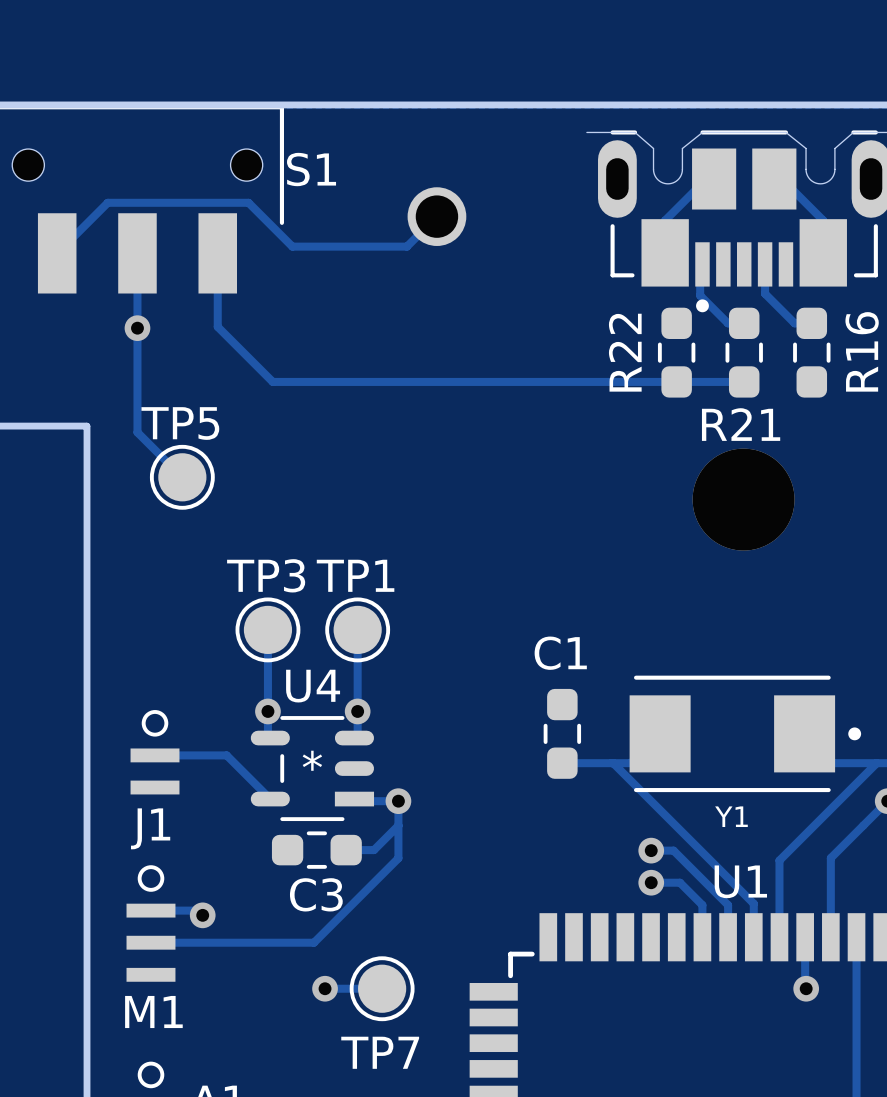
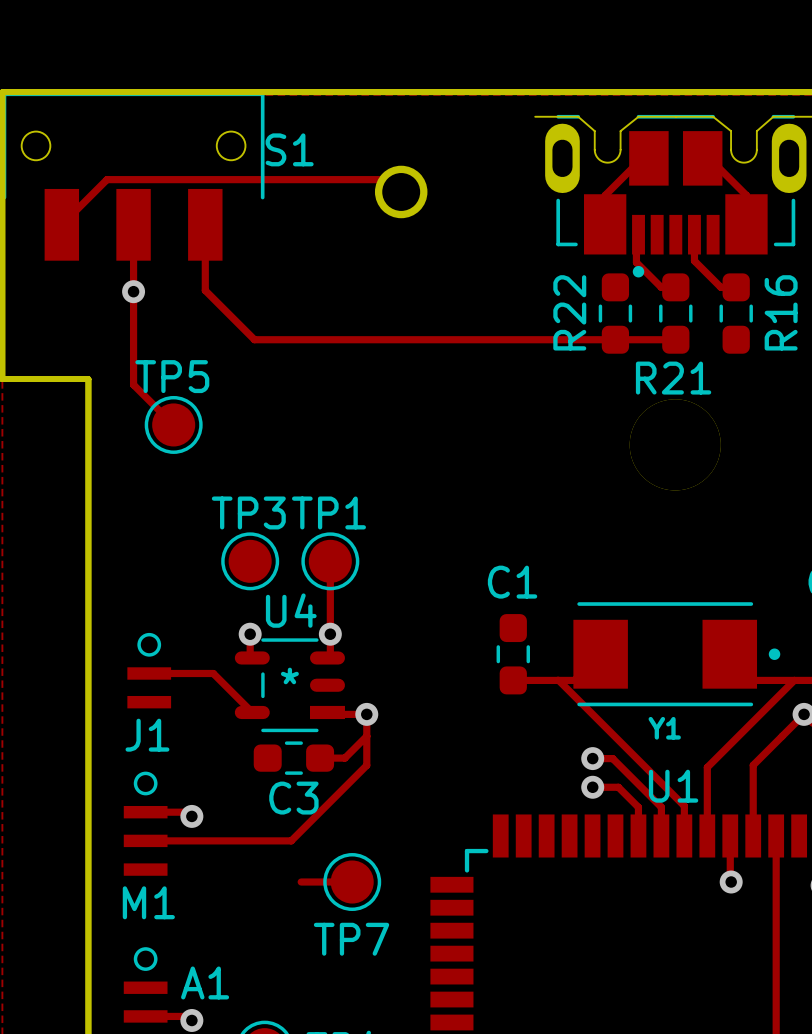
track: (248, 202) (292, 246) (406, 246) (436, 216) -> (232, 179) (388, 179) (401, 191)
track: (267, 629) (267, 711) -> none
via: (325, 988) -> none

